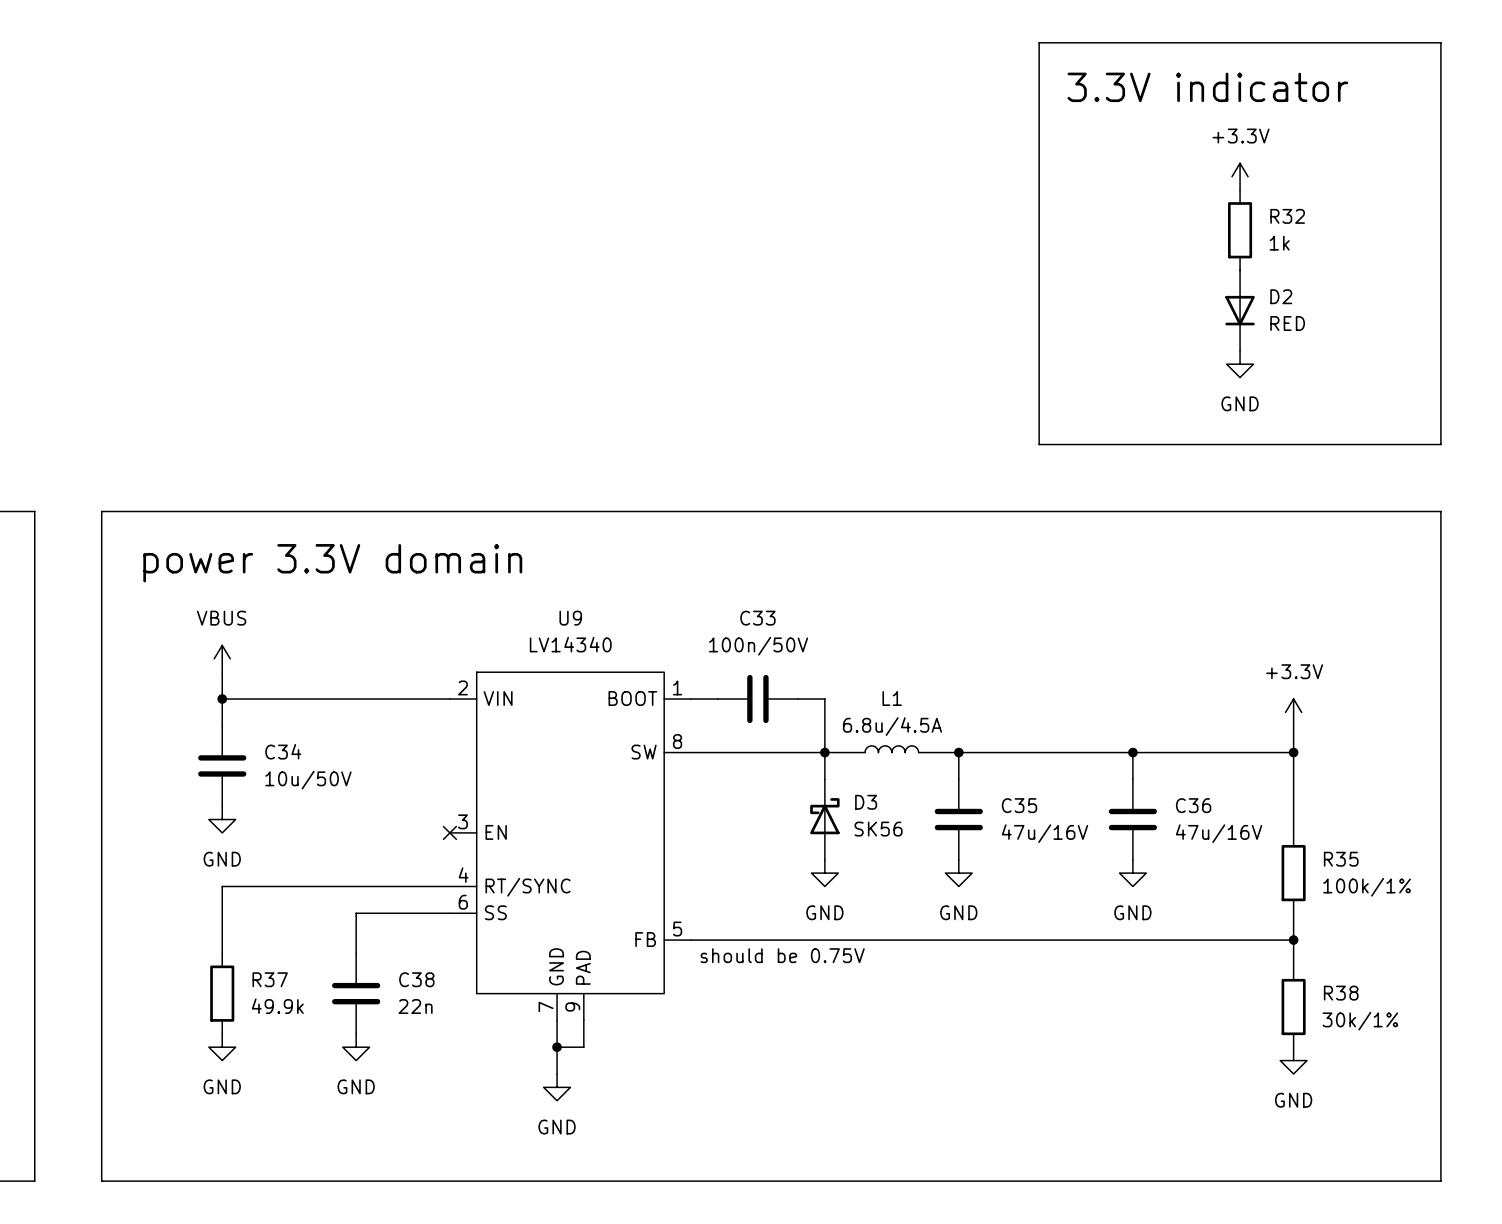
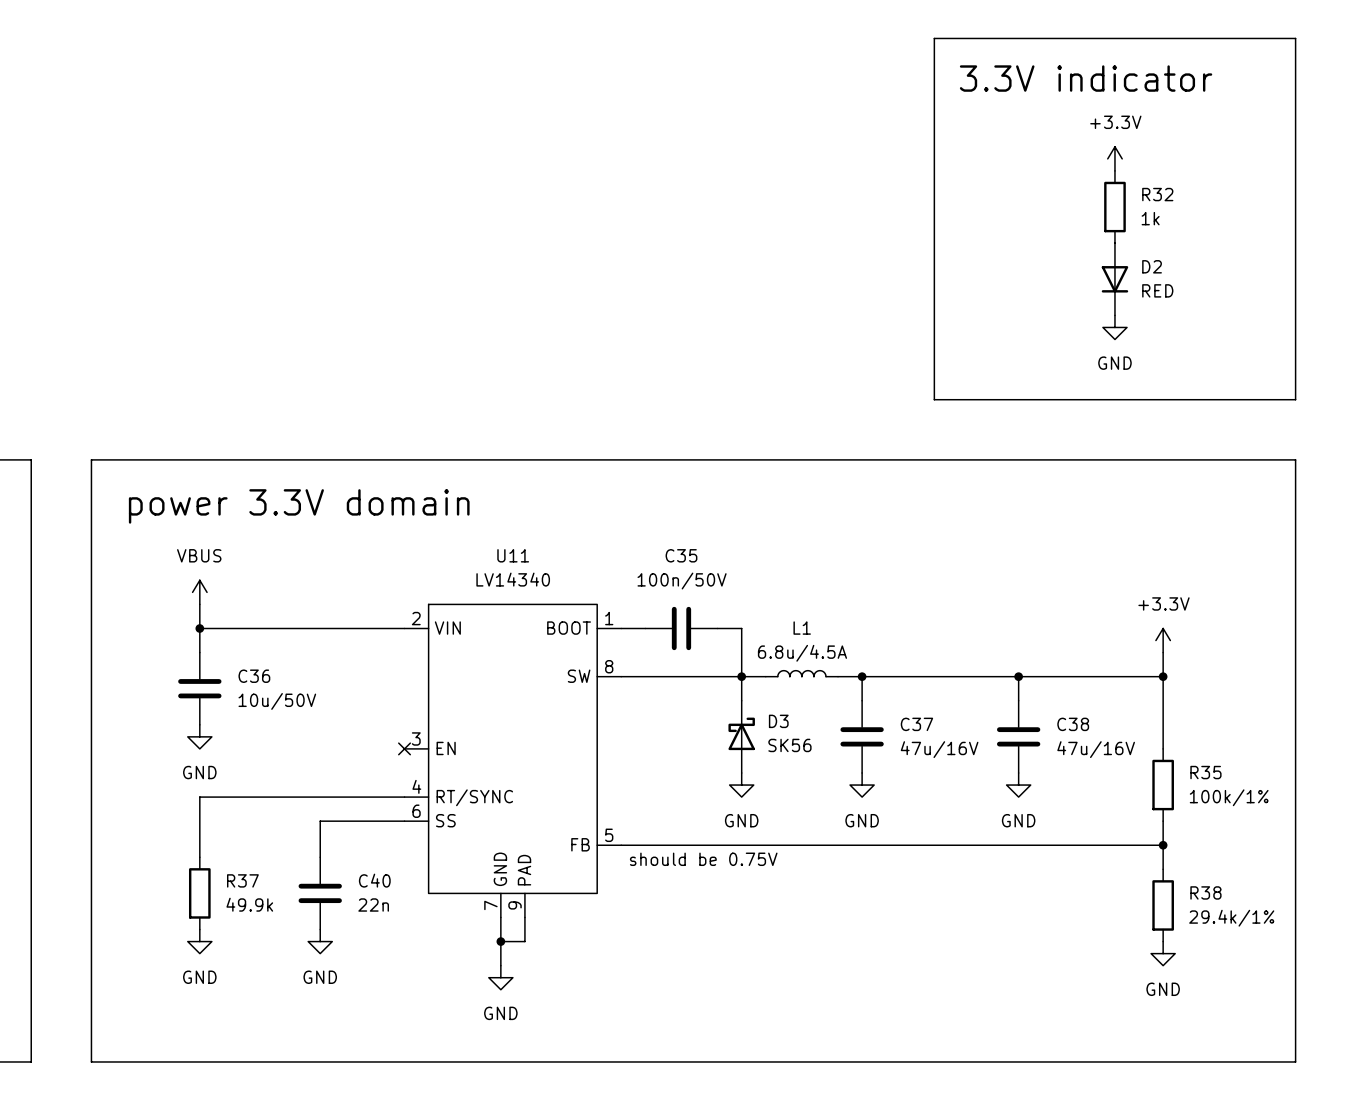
U9 name: U9 (570, 618) -> U11 (513, 555)
C33 name: C33 (757, 618) -> C35 (681, 555)
C34 name: C34 (283, 751) -> C36 (254, 676)
C35 name: C35 (1019, 805) -> C37 (916, 724)
C36 name: C36 (1193, 805) -> C38 (1073, 724)
C38 name: C38 (416, 979) -> C40 (374, 880)
R38 value: 30k/1% (1360, 1021) -> 29.4k/1% (1231, 918)

